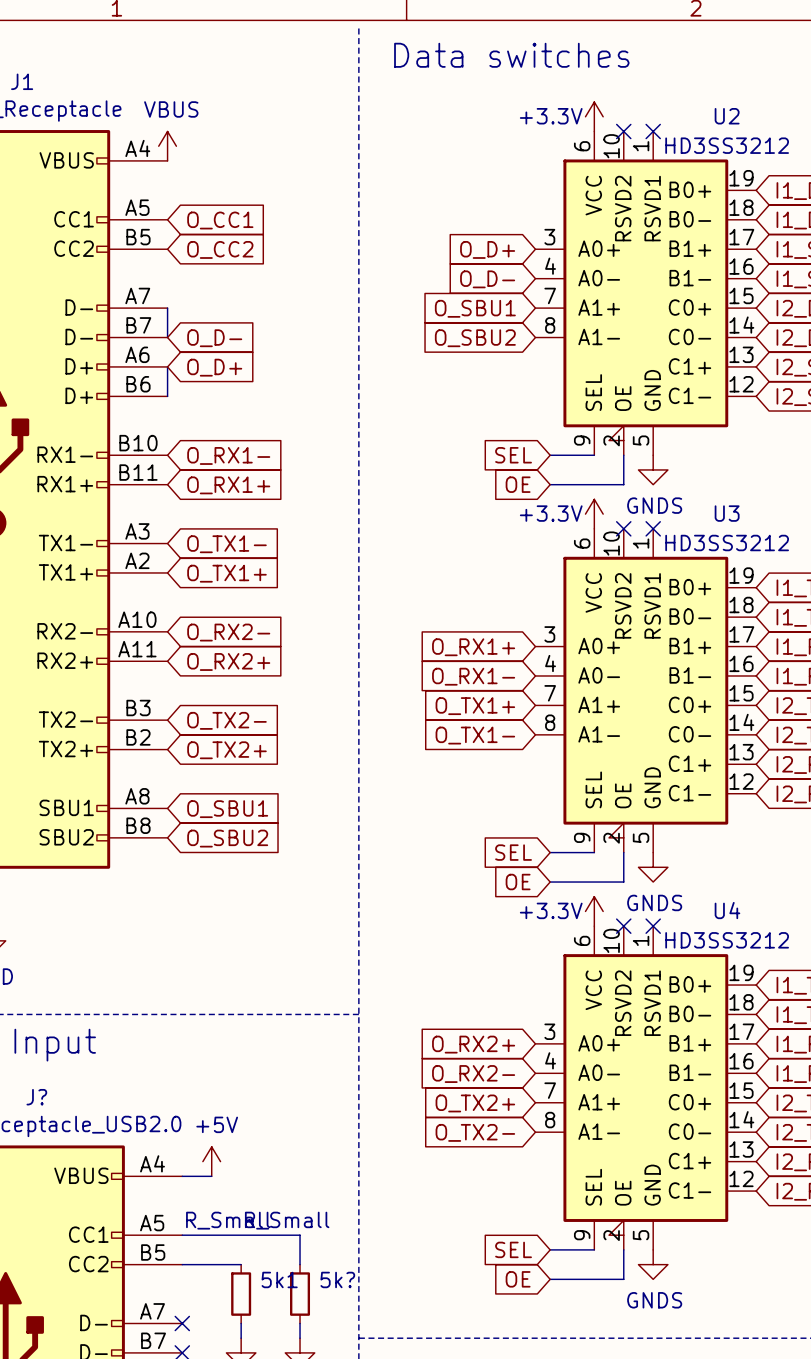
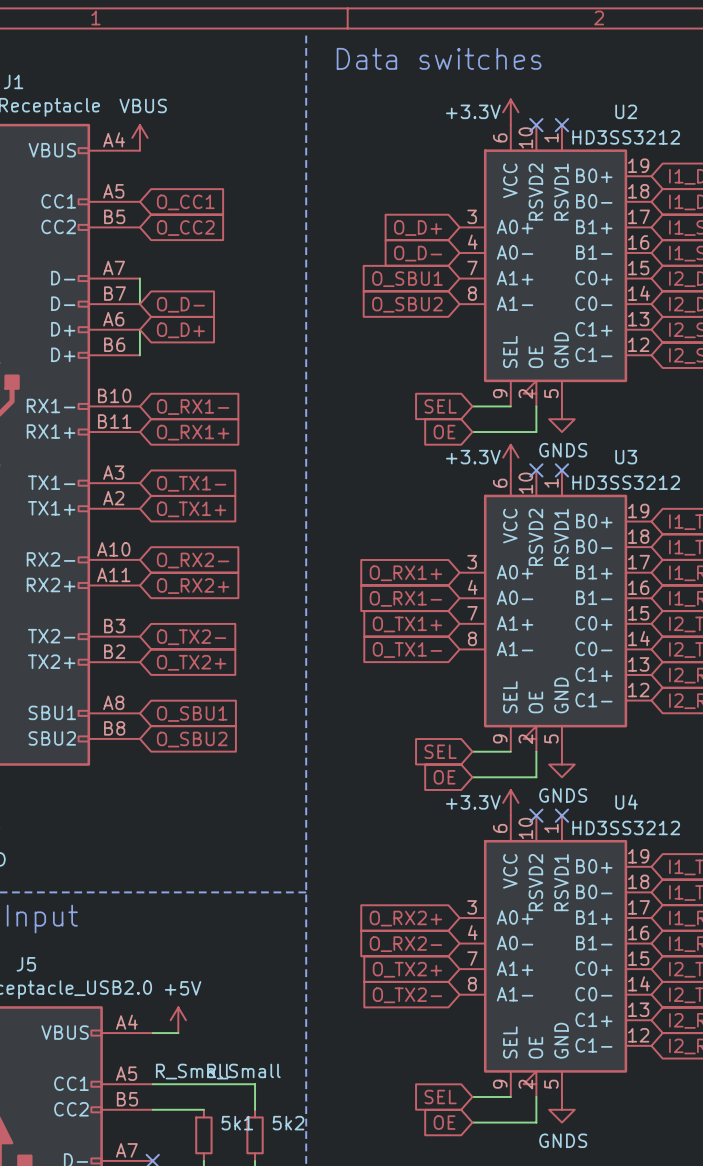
J? name: J? (36, 1097) -> J5 (26, 964)
5k? name: 5k? (337, 1279) -> 5k2 (288, 1123)

